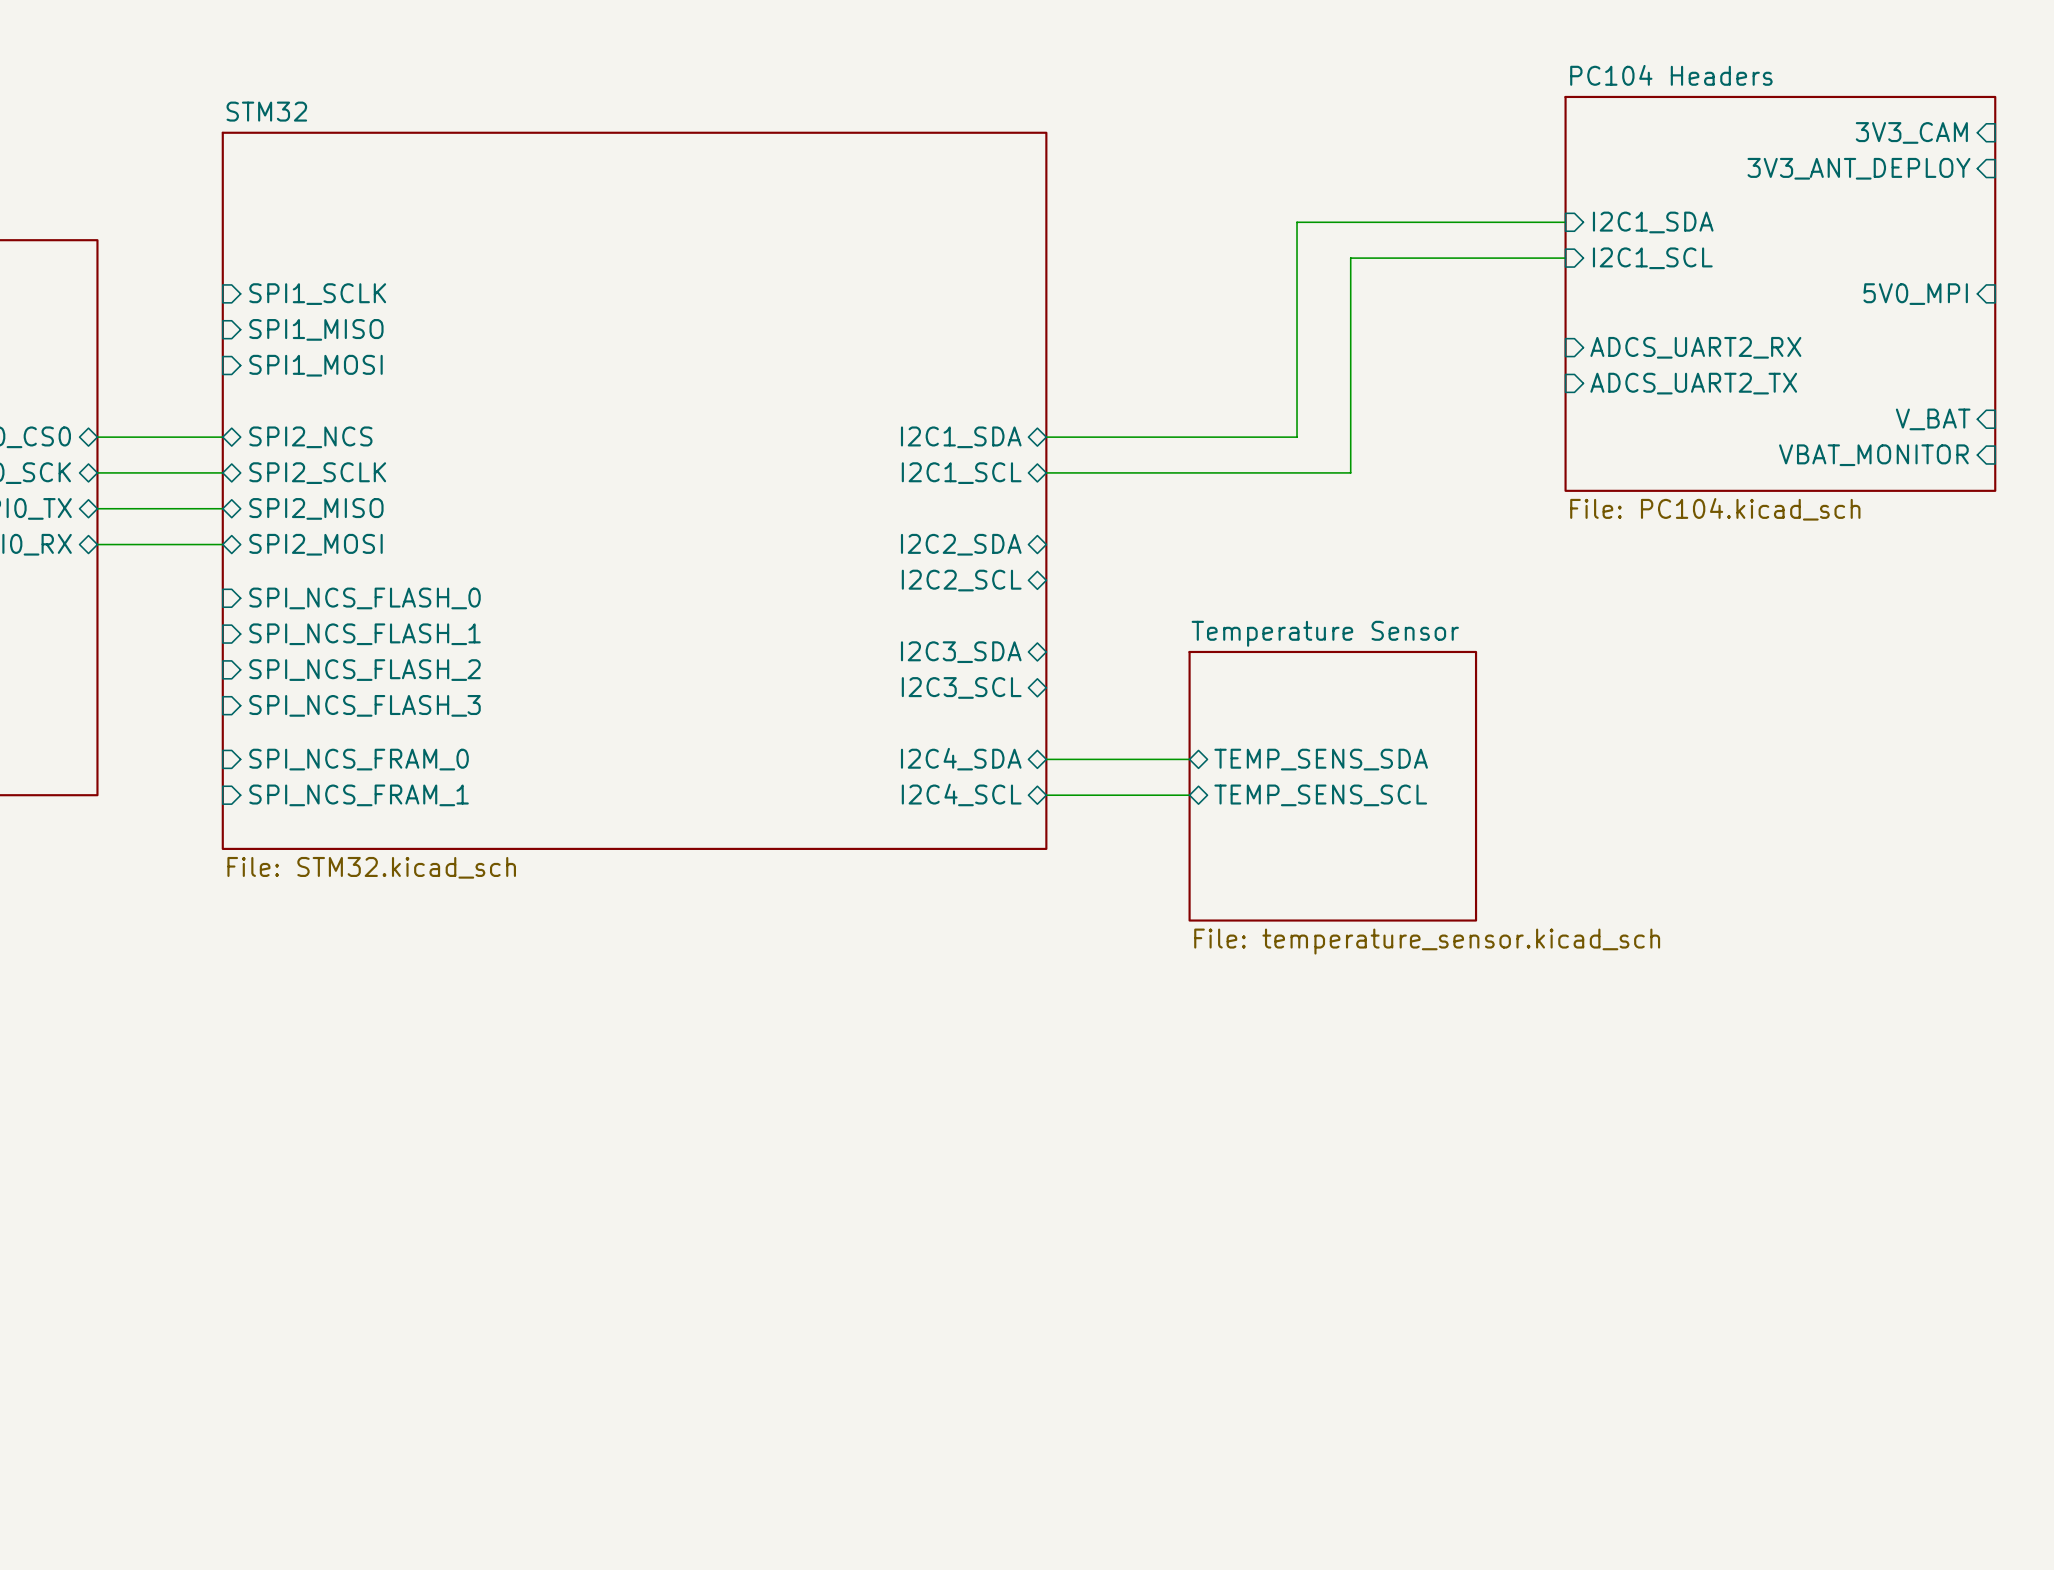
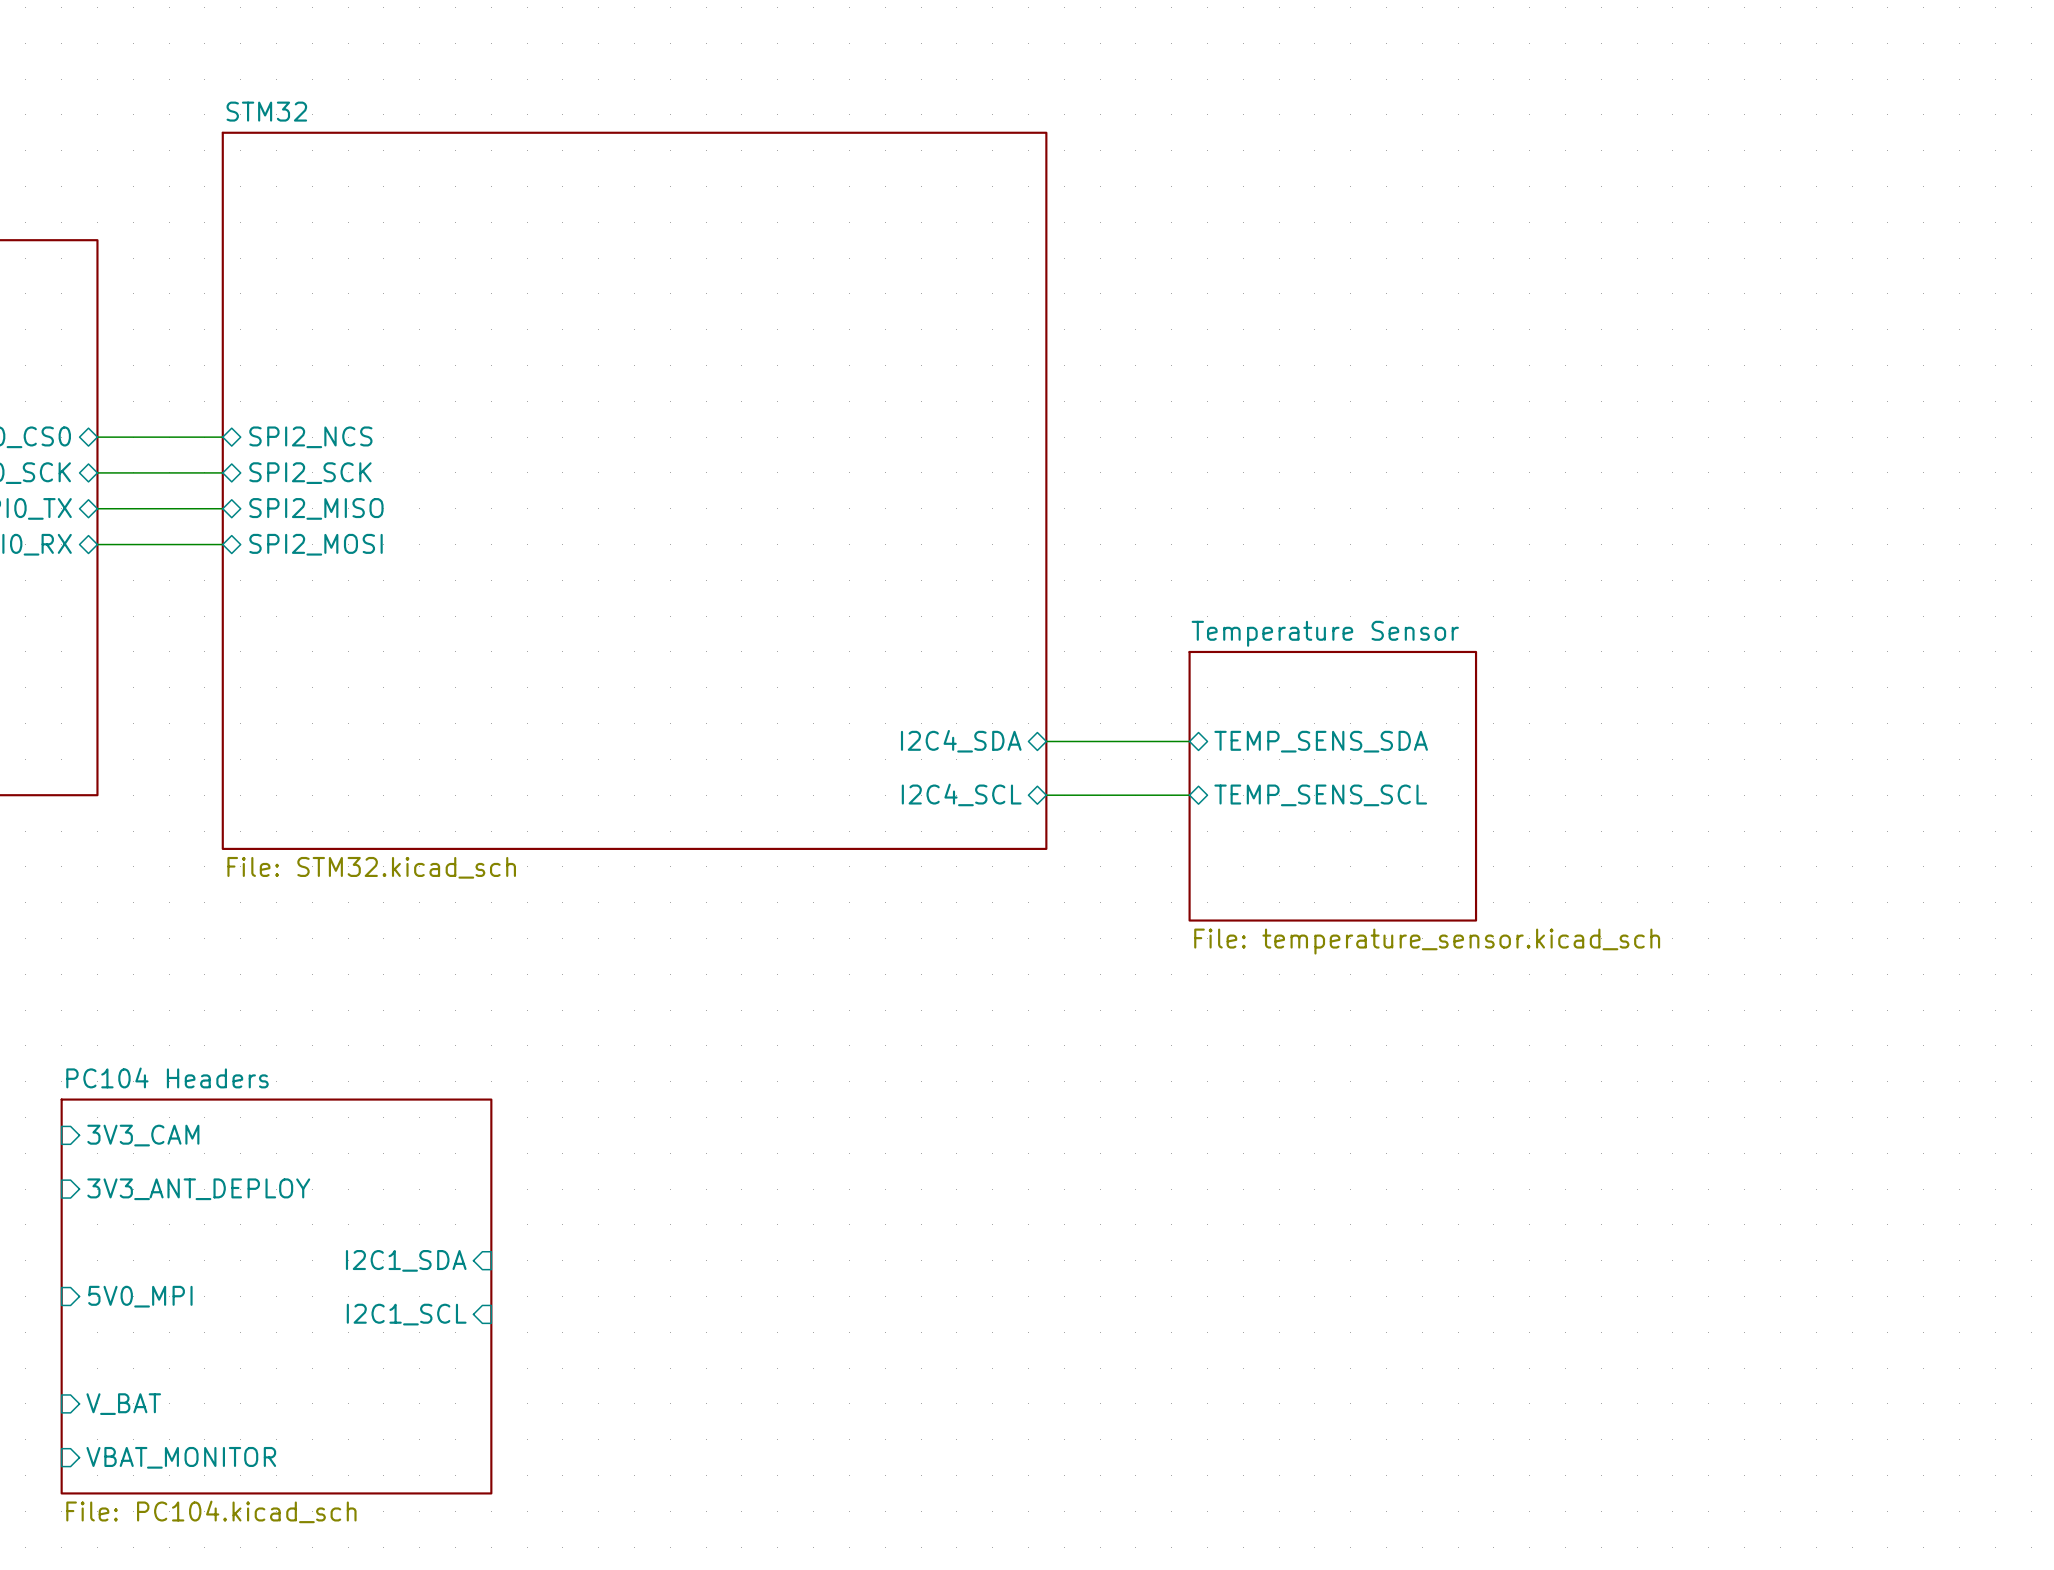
sheet pin: 3V3_CAM (1911, 132) -> none
sheet pin: 3V3_ANT_DEPLOY (1858, 168) -> none
wire: (1565, 222) (1297, 222) (1297, 437) (1046, 437) -> none
sheet pin: I2C1_SDA (1653, 222) -> none
wire: (1565, 258) (1350, 258) (1350, 472) (1046, 472) -> none
sheet pin: I2C1_SCL (1652, 258) -> none
sheet PC104 Headers position: (1780, 293) -> (276, 1296)
sheet pin: SPI1_SCLK (317, 294) -> none
sheet pin: 5V0_MPI (1915, 294) -> none
sheet pin: SPI1_MISO (316, 329) -> none
sheet pin: ADCS_UART2_RX (1695, 347) -> none
sheet pin: SPI1_MOSI (316, 365) -> none
sheet pin: ADCS_UART2_TX (1693, 383) -> none
sheet pin: V_BAT (1933, 419) -> none
sheet pin: I2C1_SDA (961, 437) -> none
sheet pin: VBAT_MONITOR (1873, 455) -> none
sheet pin: SPI2_SCLK (317, 473) -> SPI2_SCK (310, 473)
sheet pin: I2C1_SCL (961, 473) -> none
sheet pin: I2C2_SDA (961, 544) -> none
sheet pin: I2C2_SCL (961, 580) -> none
sheet pin: SPI_NCS_FLASH_0 (365, 598) -> none
sheet pin: SPI_NCS_FLASH_1 (365, 634) -> none
sheet pin: I2C3_SDA (961, 652) -> none
sheet pin: SPI_NCS_FLASH_2 (365, 670) -> none
sheet pin: I2C3_SCL (961, 687) -> none
sheet pin: SPI_NCS_FLASH_3 (365, 705) -> none
sheet pin: SPI_NCS_FRAM_0 (359, 759) -> none
sheet pin position: I2C4_SDA (961, 759) -> I2C4_SDA (961, 741)
wire: (1046, 759) (1189, 759) -> (1046, 741) (1189, 741)
sheet pin position: TEMP_SENS_SDA (1321, 759) -> TEMP_SENS_SDA (1321, 741)
sheet pin: SPI_NCS_FRAM_1 (359, 795) -> none
sheet pin: none -> 3V3_CAM (143, 1135)
sheet pin: none -> 3V3_ANT_DEPLOY (198, 1189)
sheet pin: none -> I2C1_SDA (406, 1260)
sheet pin: none -> 5V0_MPI (140, 1296)
sheet pin: none -> I2C1_SCL (406, 1314)
sheet pin: none -> V_BAT (123, 1404)
sheet pin: none -> VBAT_MONITOR (181, 1457)

